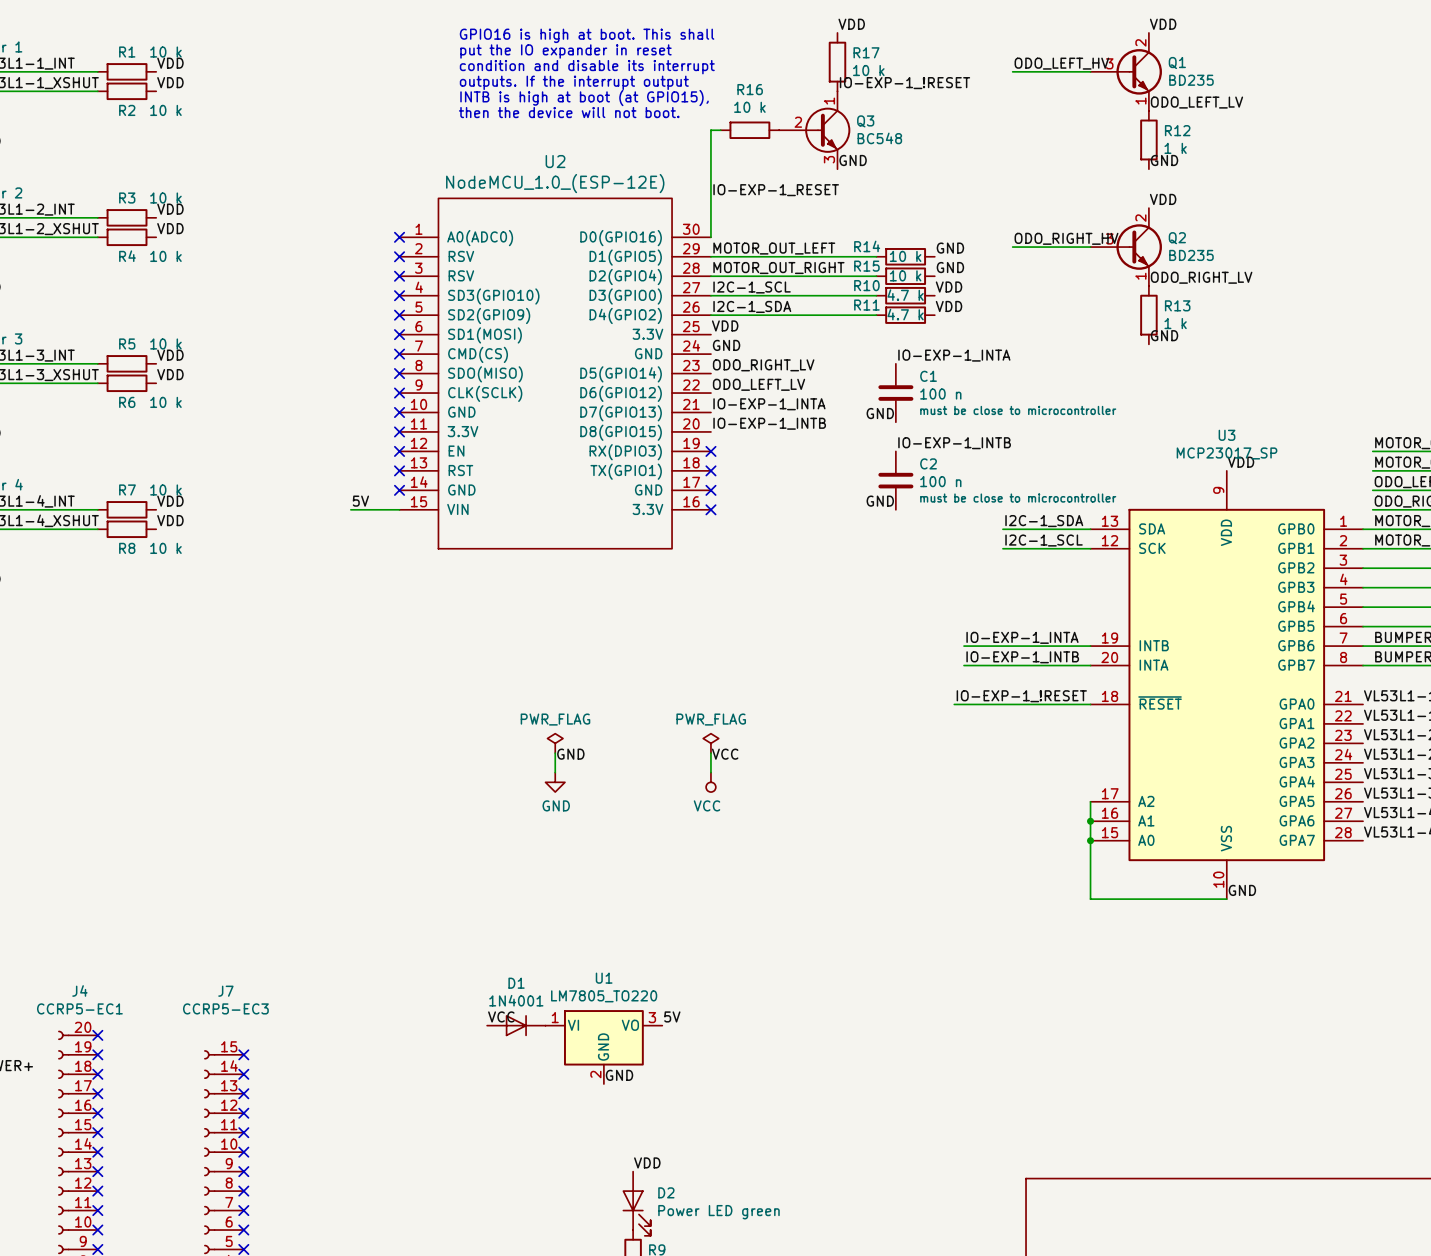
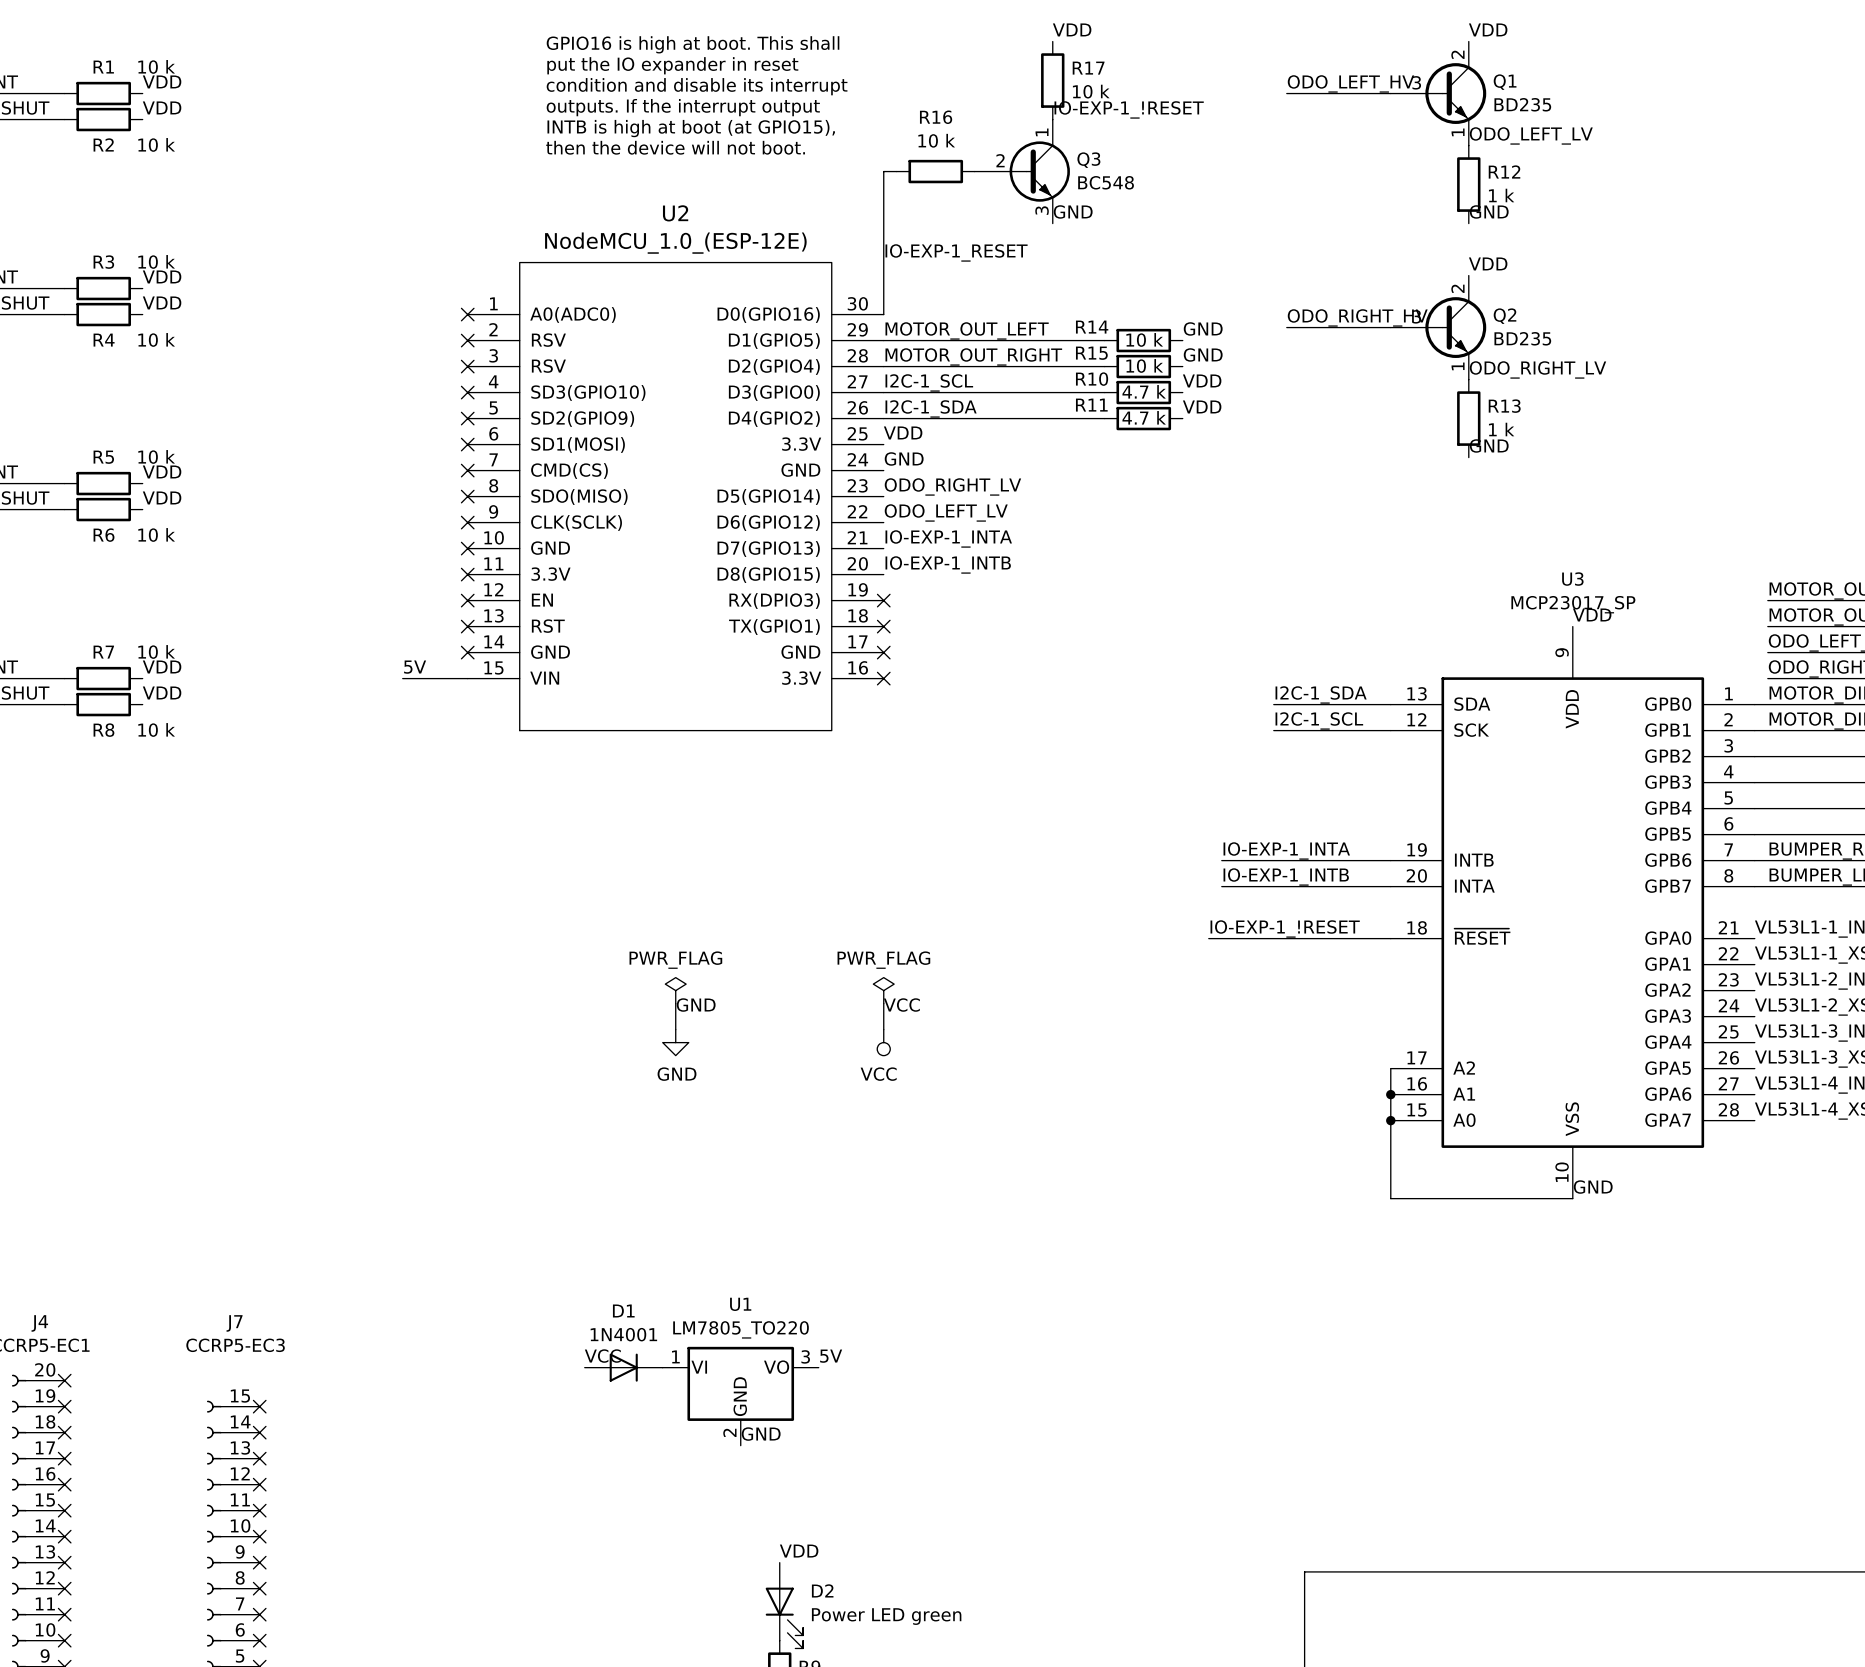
label: IO-EXP-1_INTA (954, 355) -> none
C1: 100 n (895, 393) -> none
label: GND (880, 413) -> none
label: IO-EXP-1_INTB (954, 443) -> none
C2: 100 n (895, 480) -> none
label: GND (880, 501) -> none

